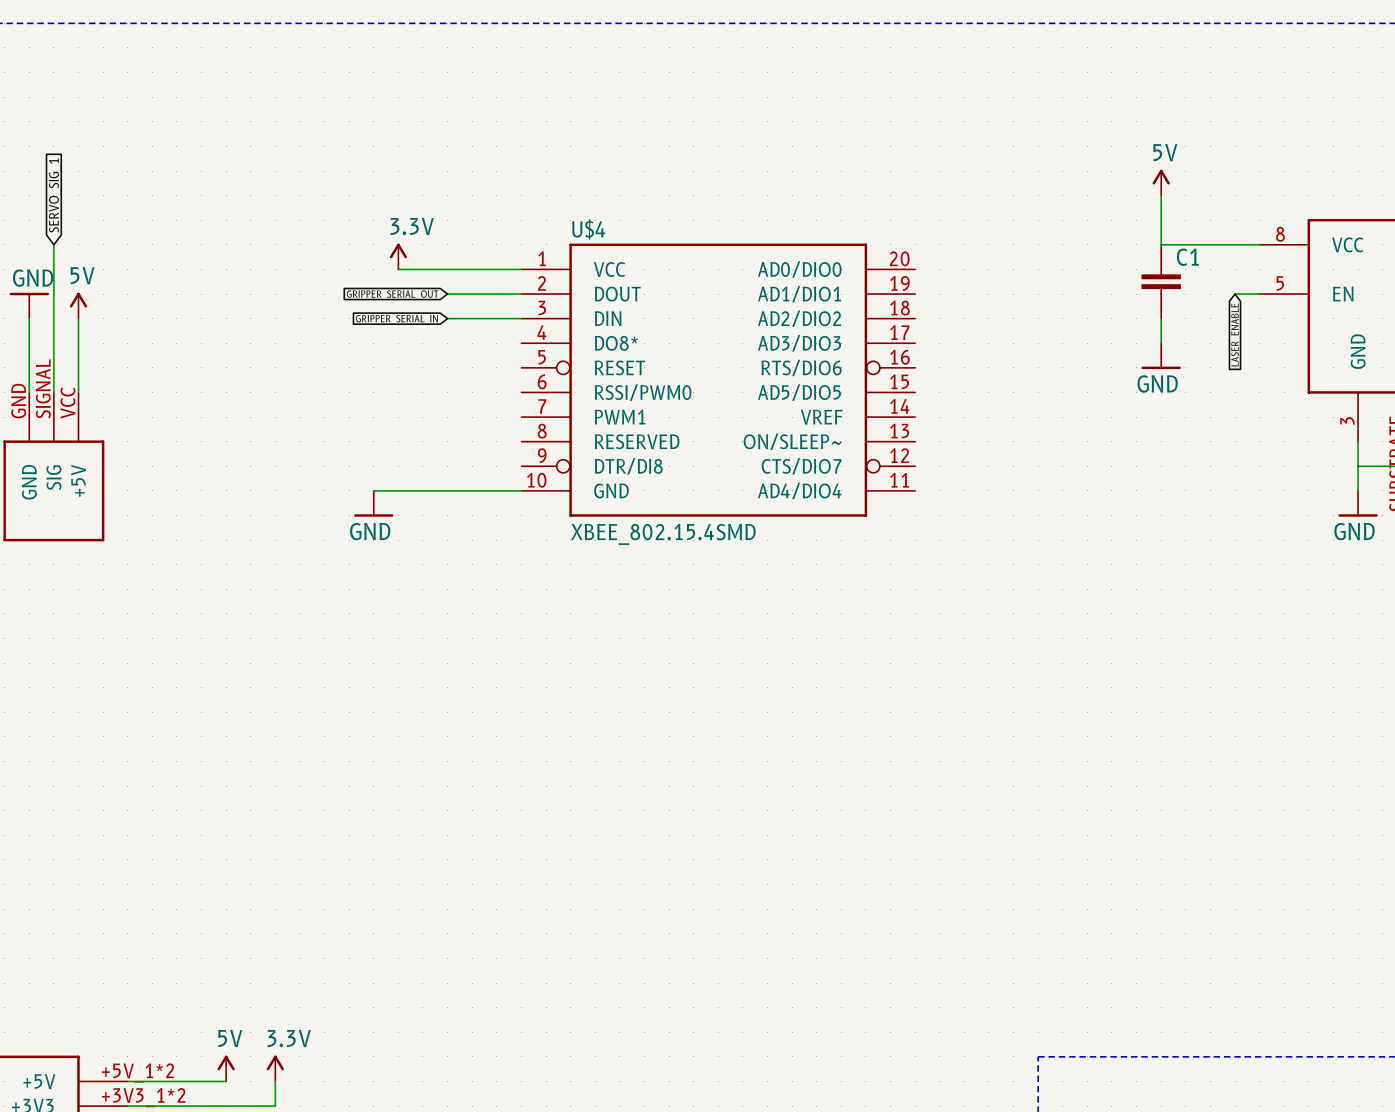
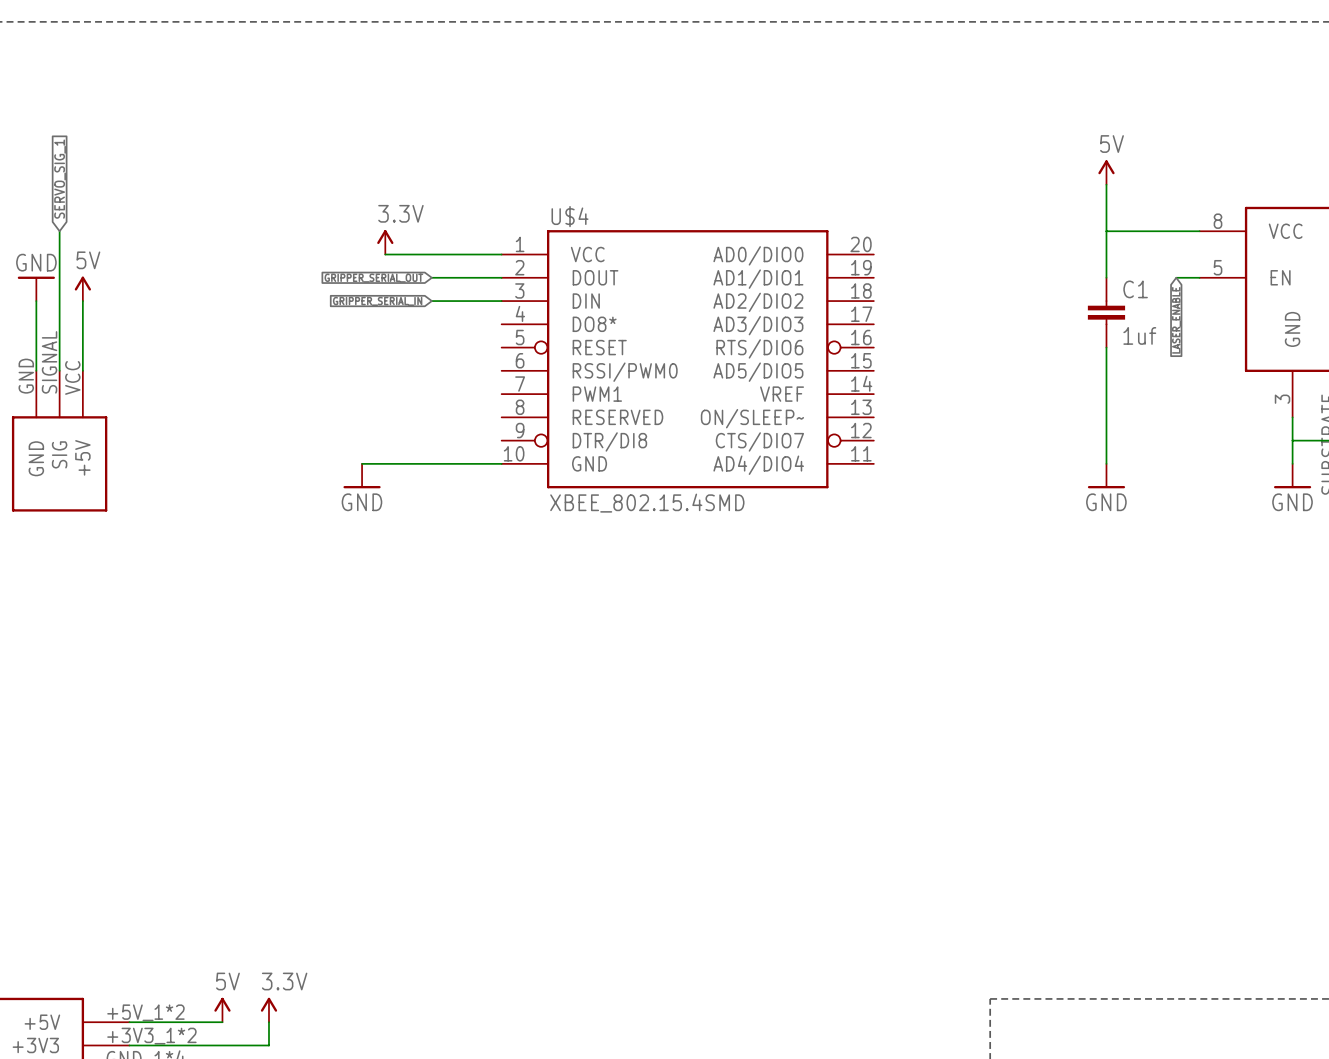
C1 position: (1161, 281) -> (1106, 312)
C1 value: none -> 1uf (1139, 335)
power symbol position: GND (1161, 356) -> GND (1106, 476)
wire: none -> (1106, 347) (1106, 463)

